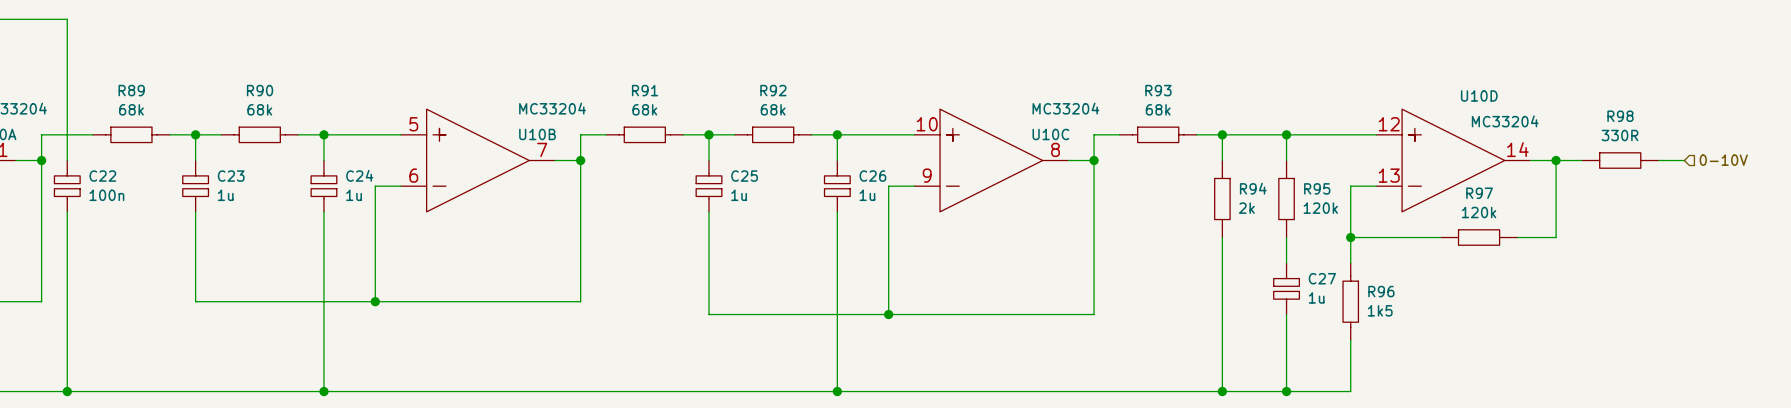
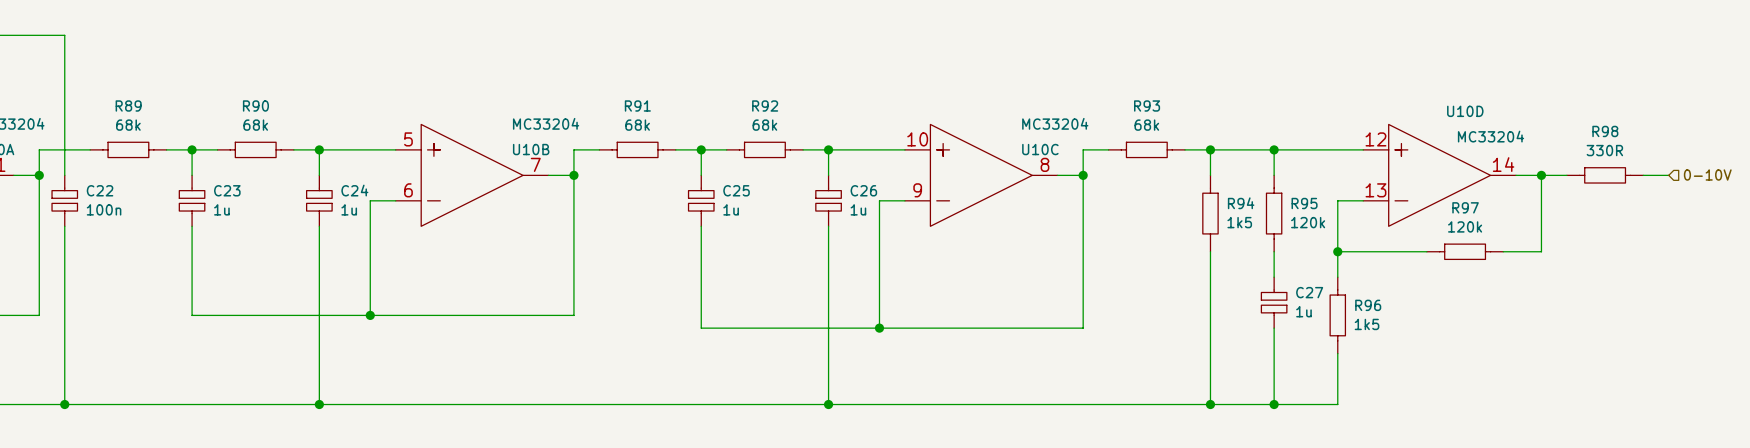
R94 value: 2k (1246, 208) -> 1k5 (1239, 222)

